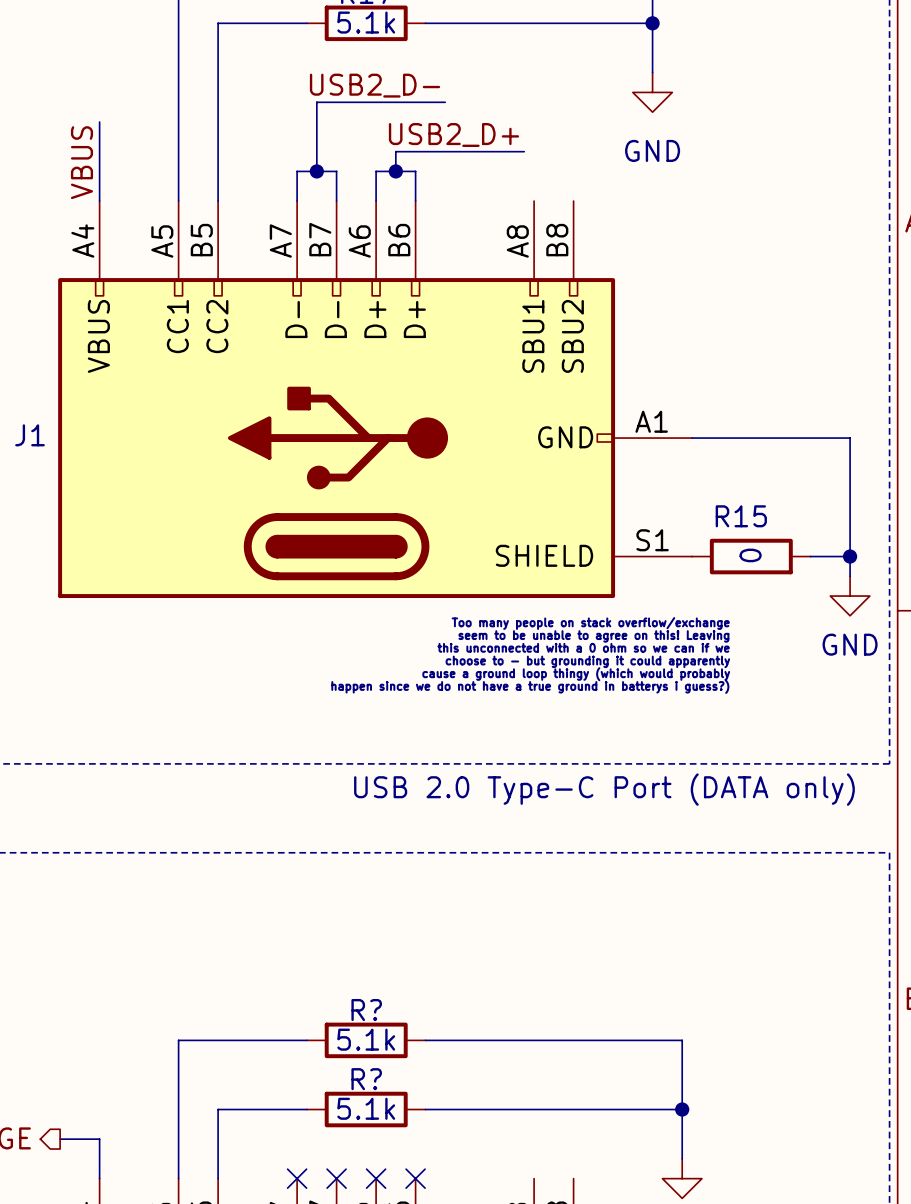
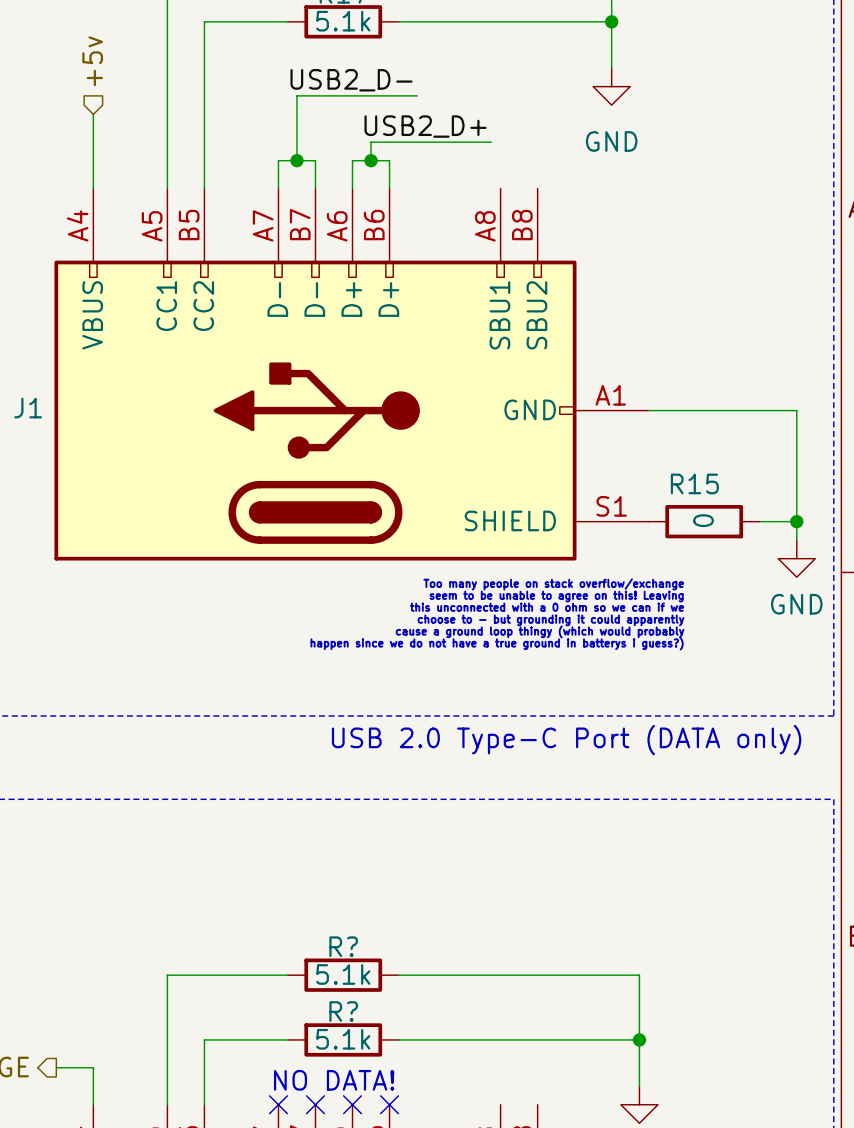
hierarchical label: none -> +5v (92, 61)
label: VBUS (81, 162) -> none
text: none -> NO DATA! (334, 1080)

